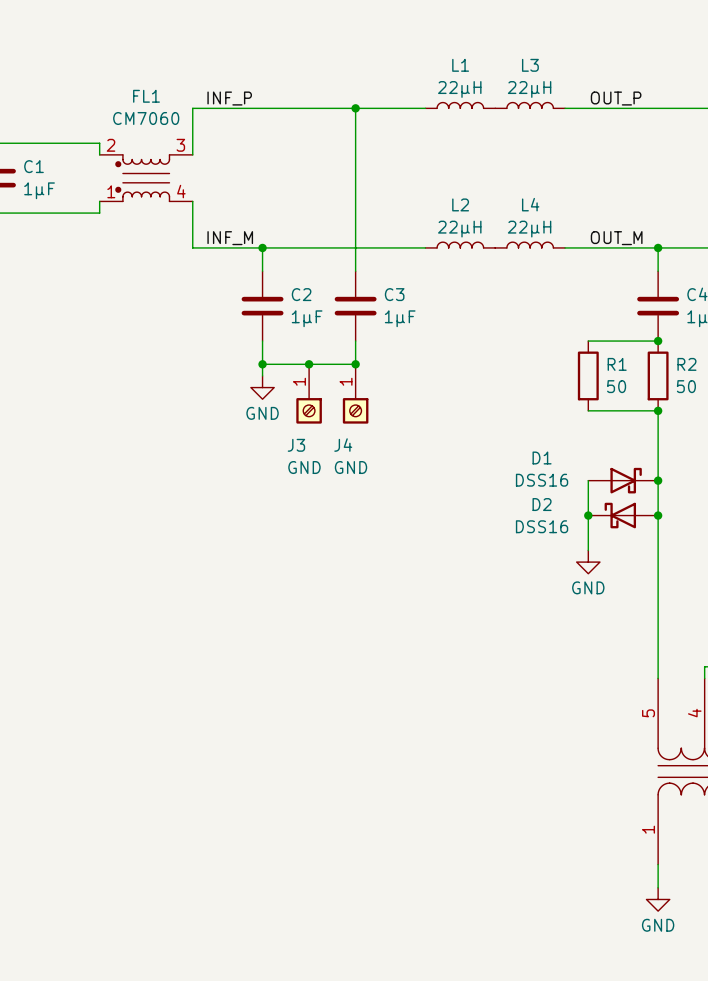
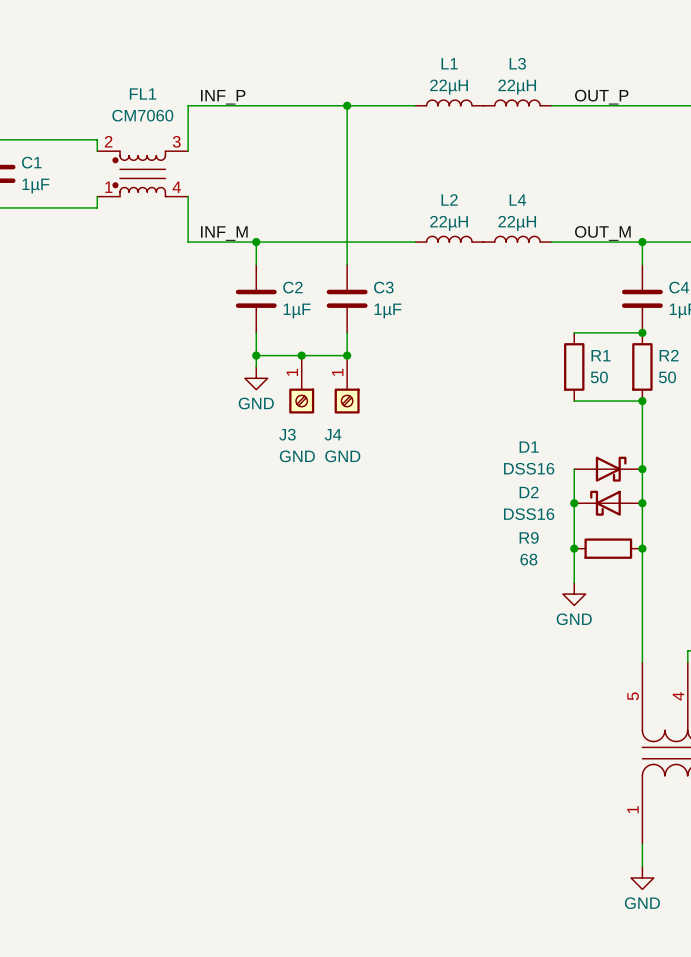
wire: none -> (574, 537) (574, 582)
power symbol position: GND (588, 562) -> GND (574, 594)
junction: none -> (574, 548)
R9: none -> 68 (608, 548)
junction: none -> (642, 548)

